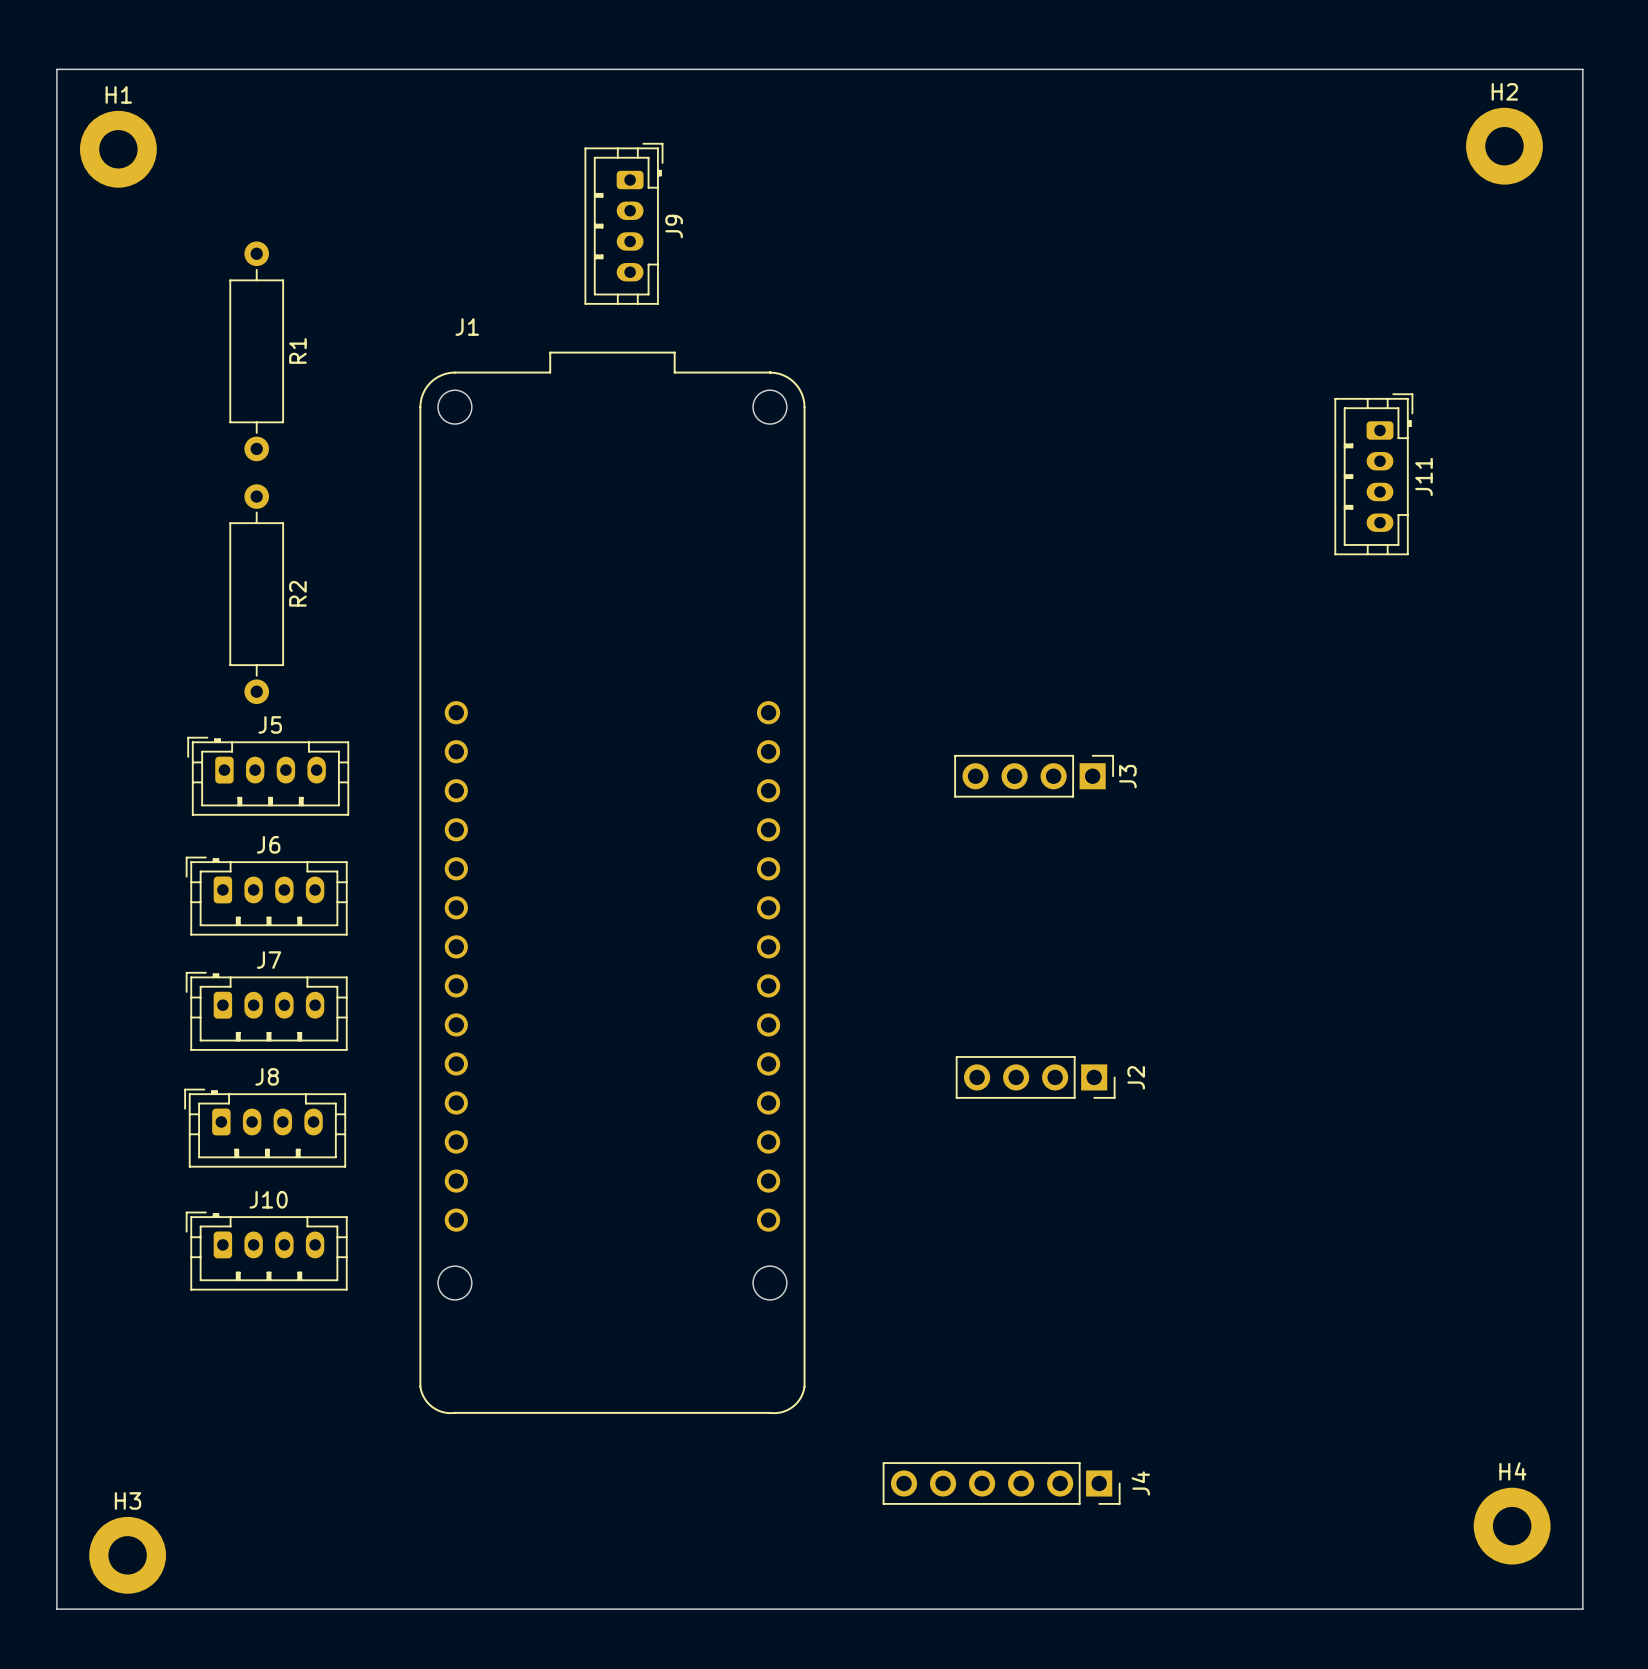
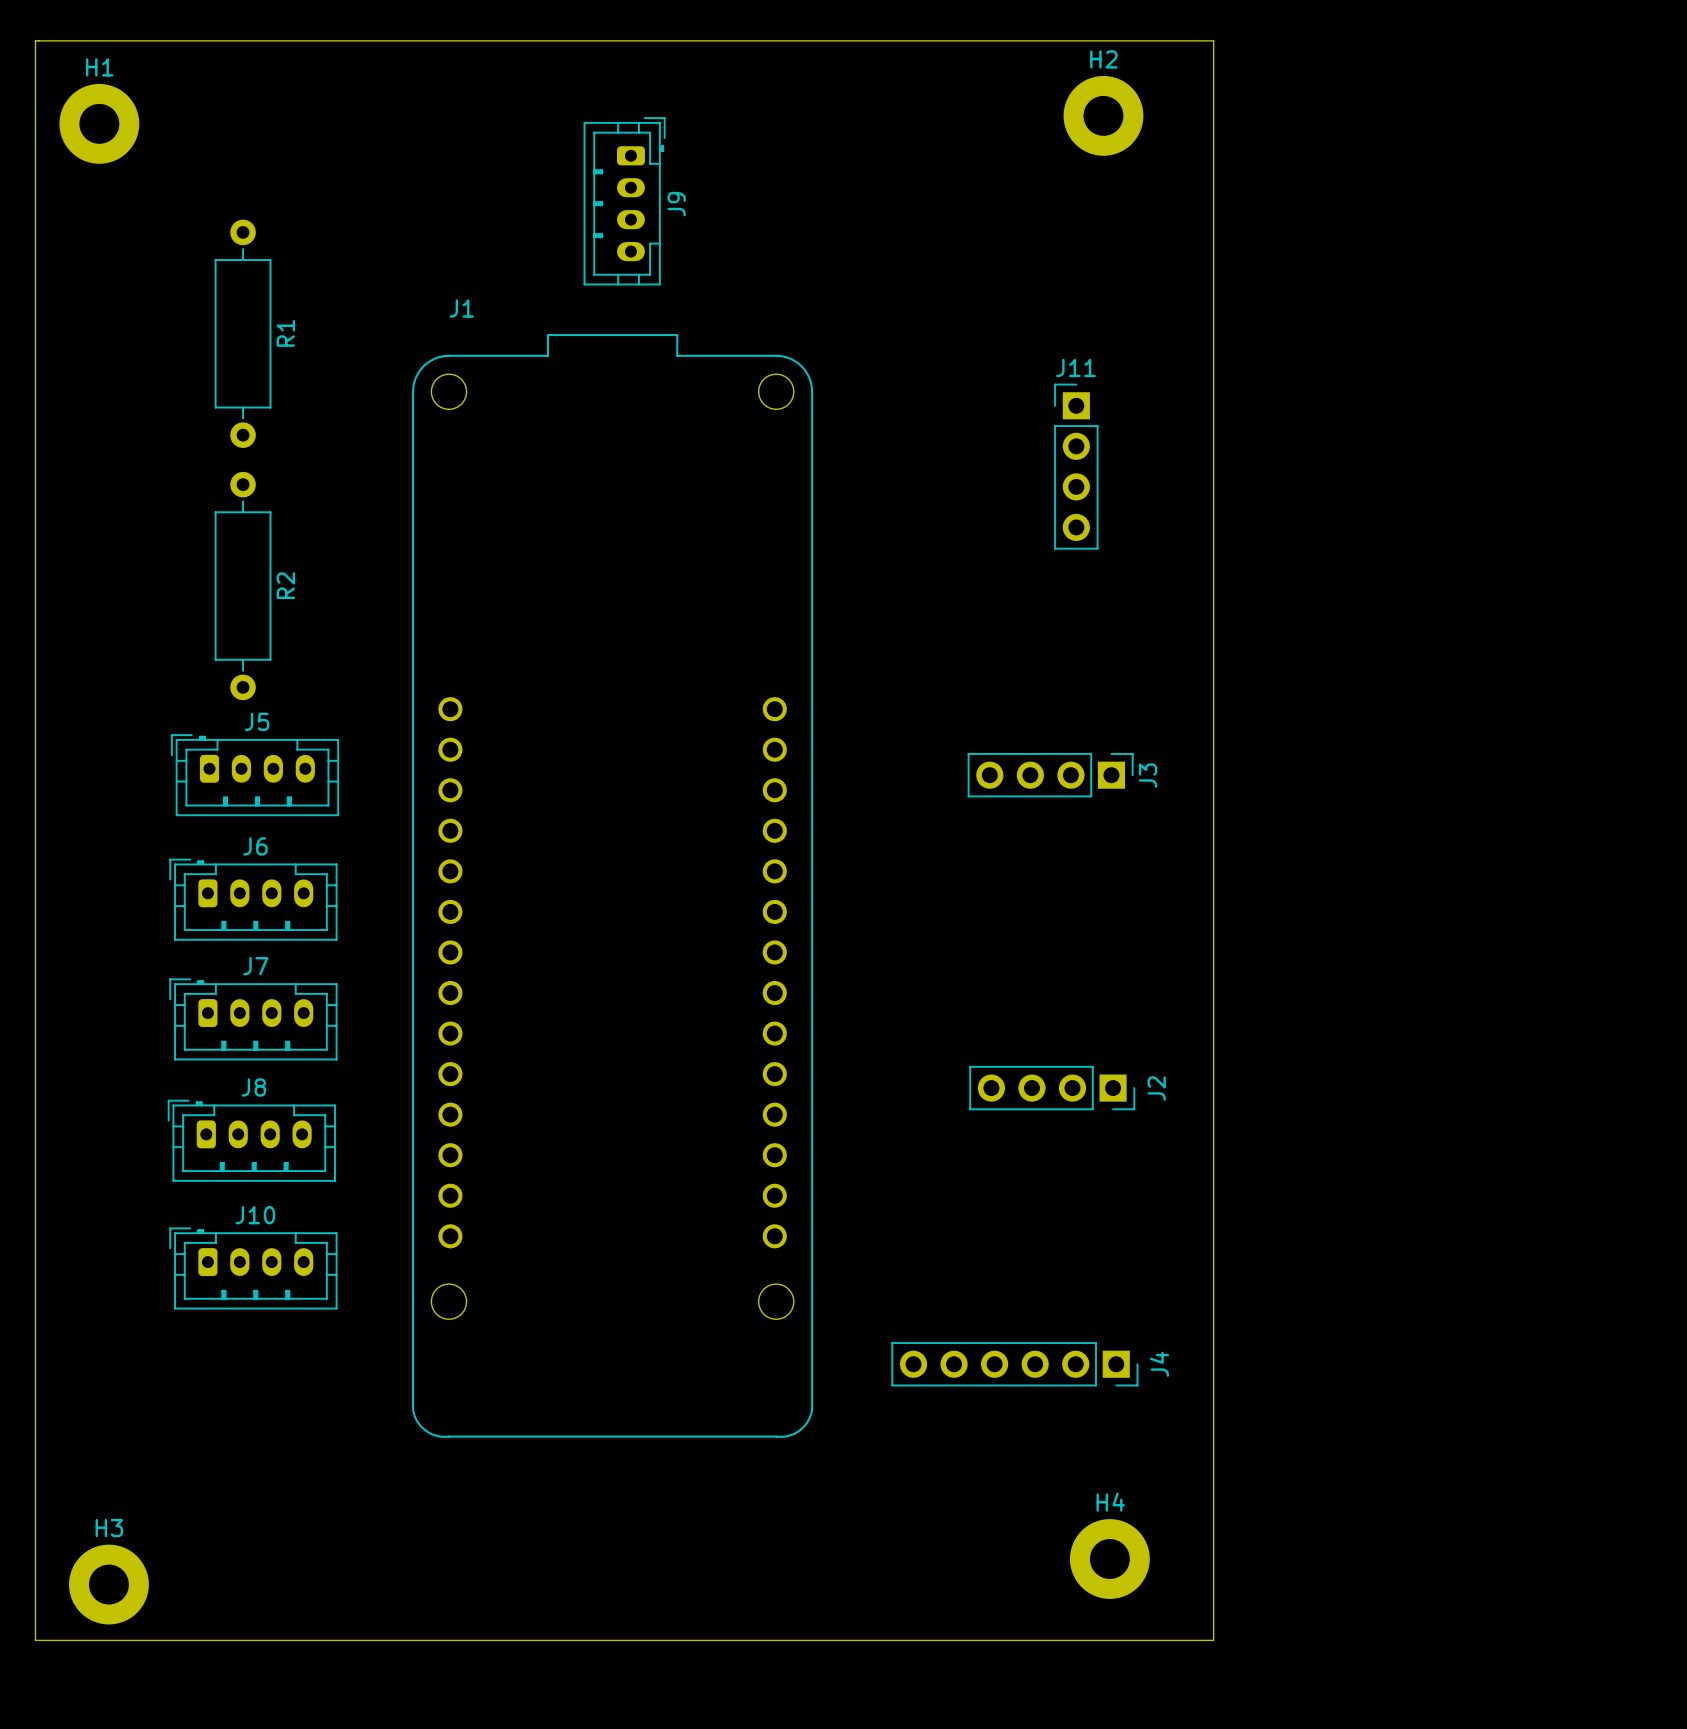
board edge: (1190, 69) (1582, 69) (1582, 1609) (1190, 1609) -> (1213, 40) (1213, 1640)
H2 position: (1504, 146) -> (1103, 115)
J11 footprint: [1334, 393, 1414, 556] -> [1054, 383, 1099, 550]
J11 name position: J11 (1423, 476) -> J11 (1075, 367)
J4 position: (1001, 1483) -> (1014, 1364)
H4 position: (1512, 1526) -> (1109, 1559)

